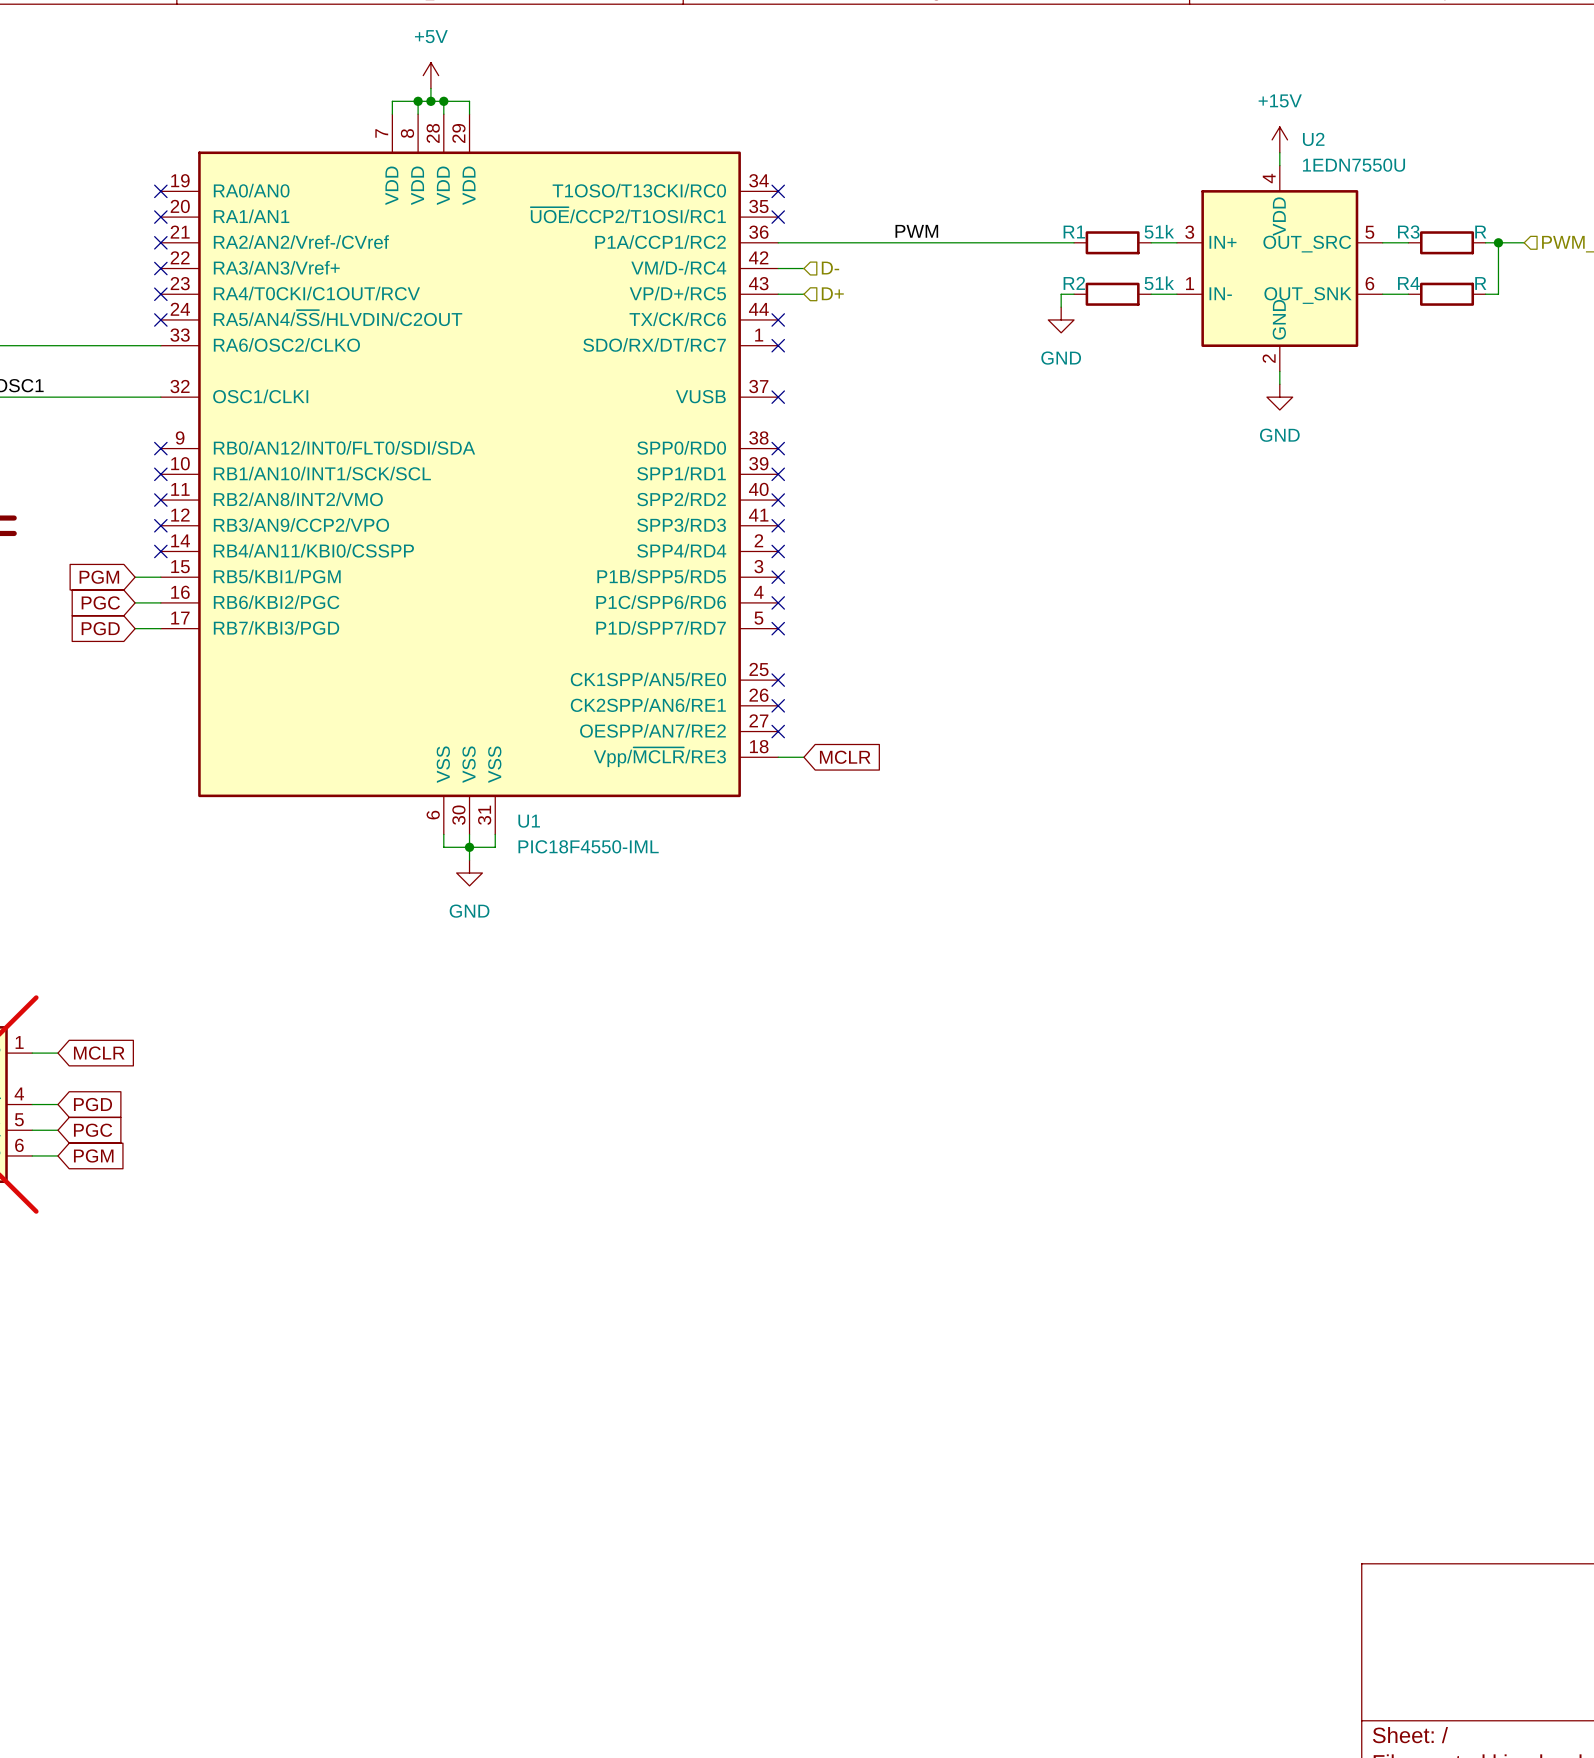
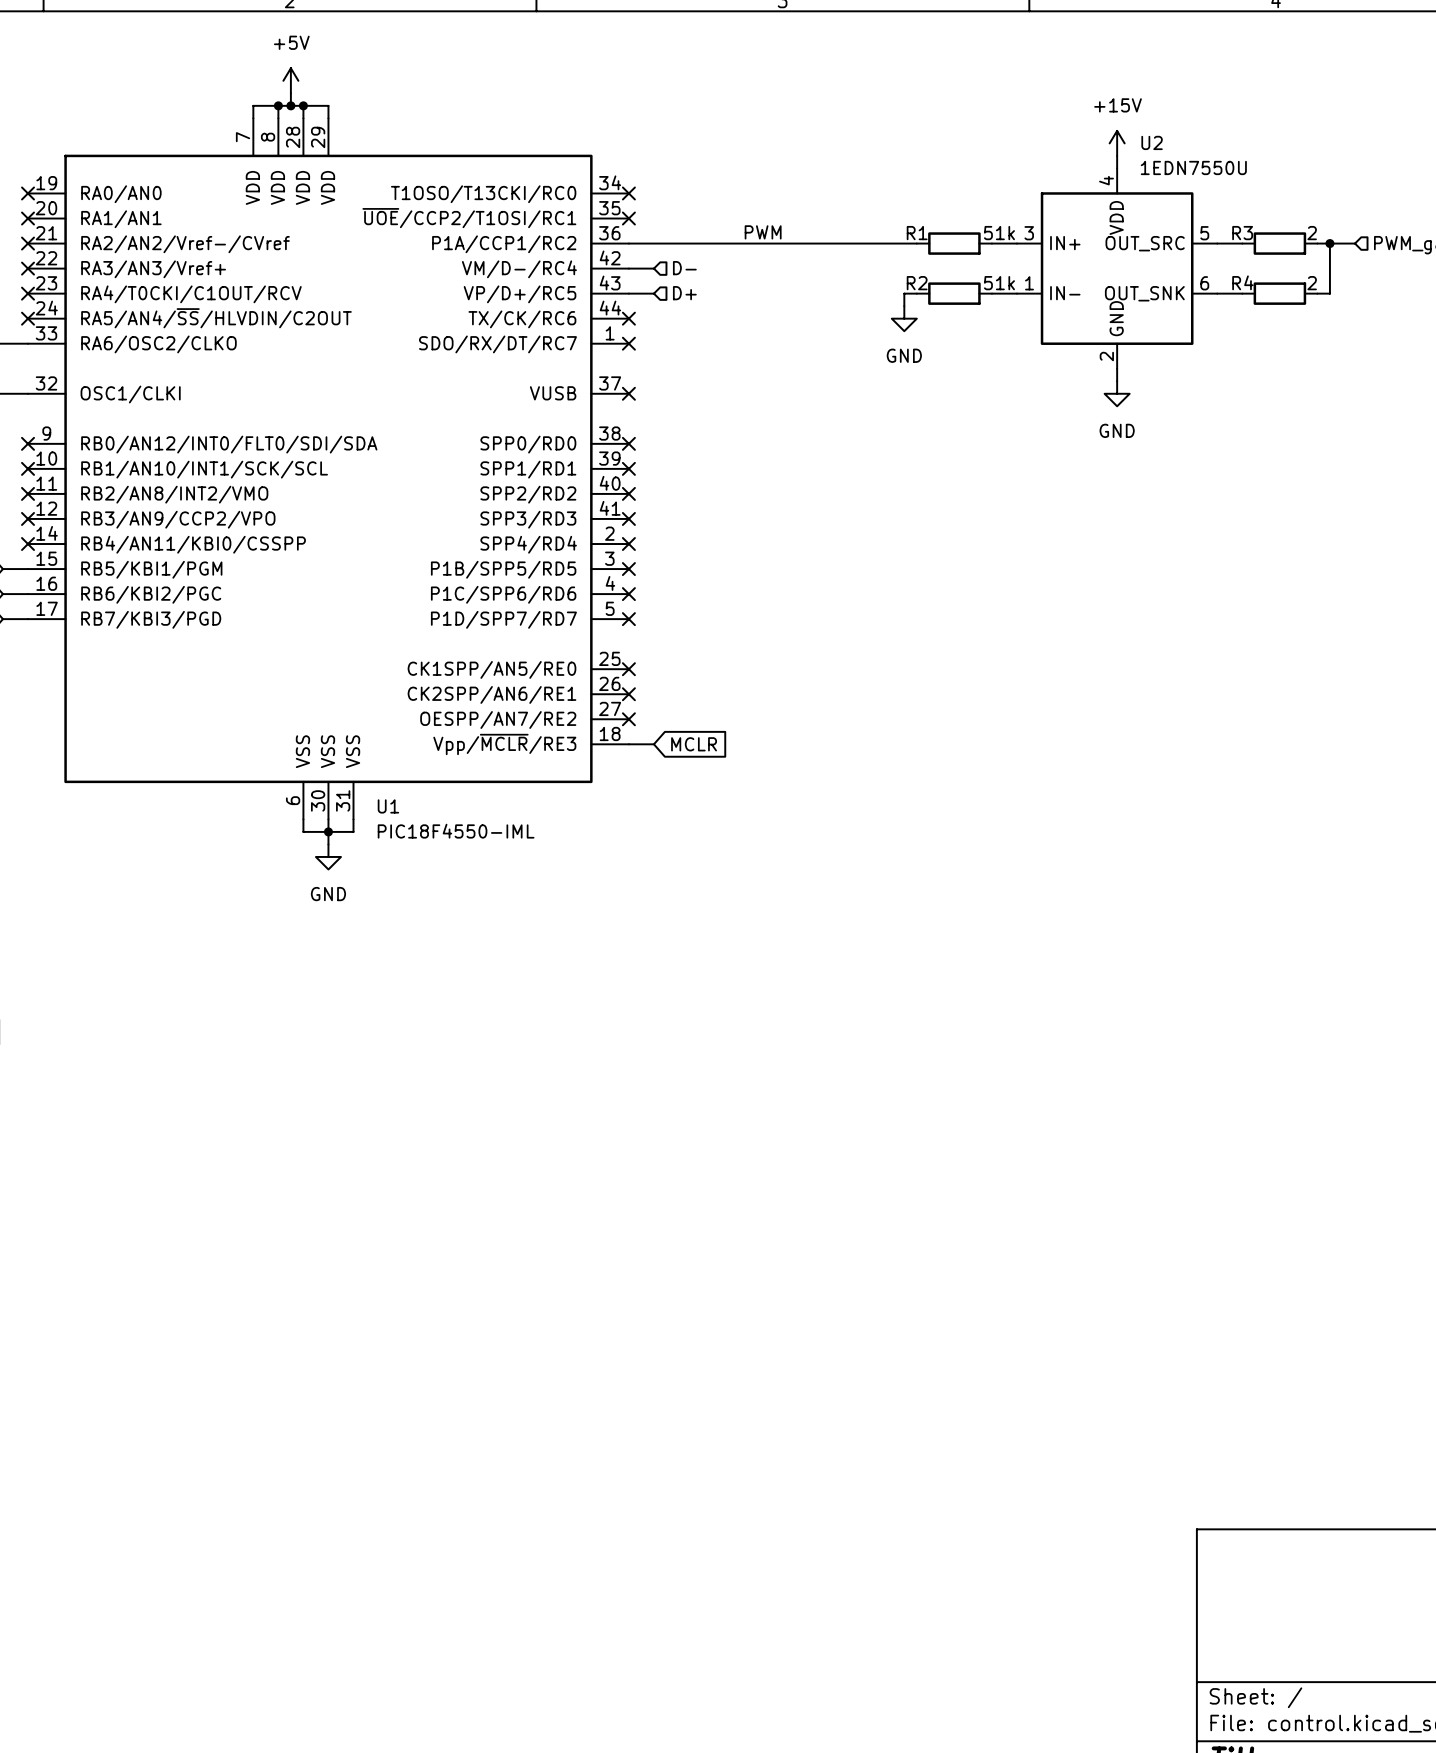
R3 value: R (1480, 232) -> 2 (1312, 233)
R4 value: R (1480, 283) -> 2 (1312, 283)

